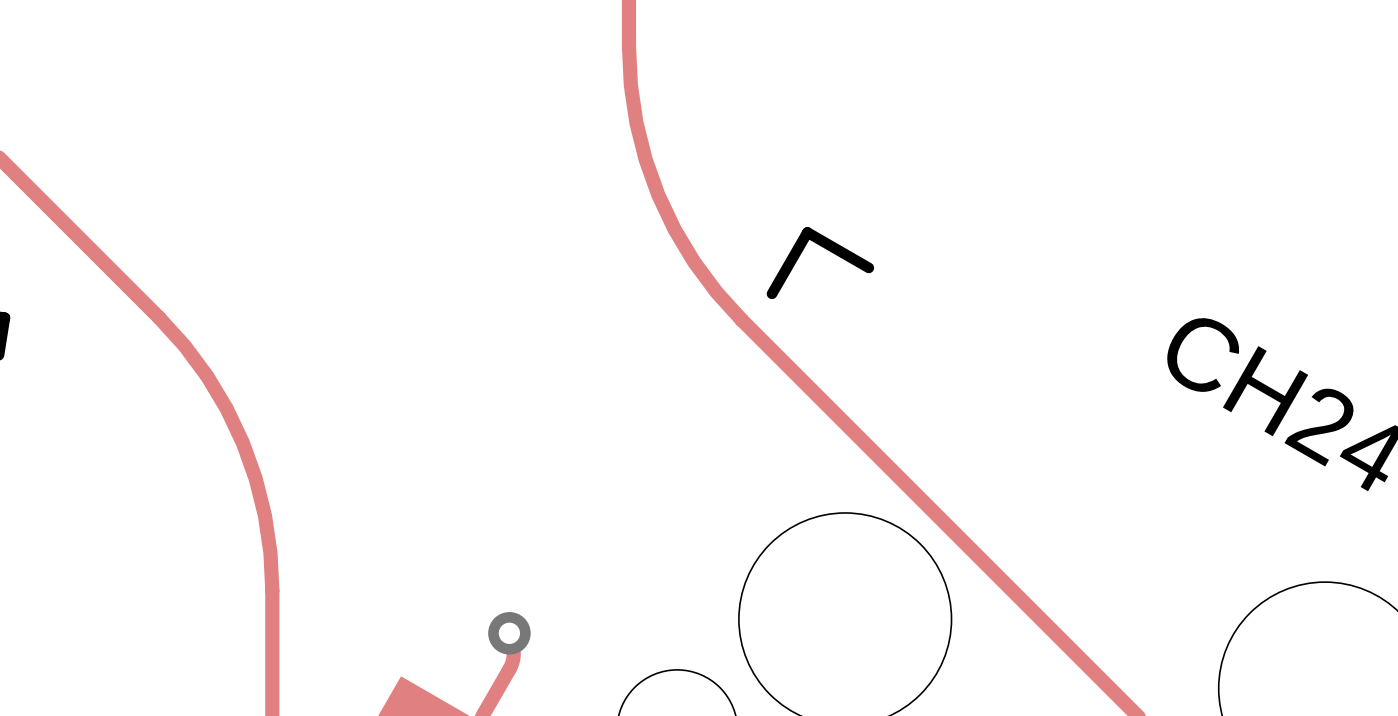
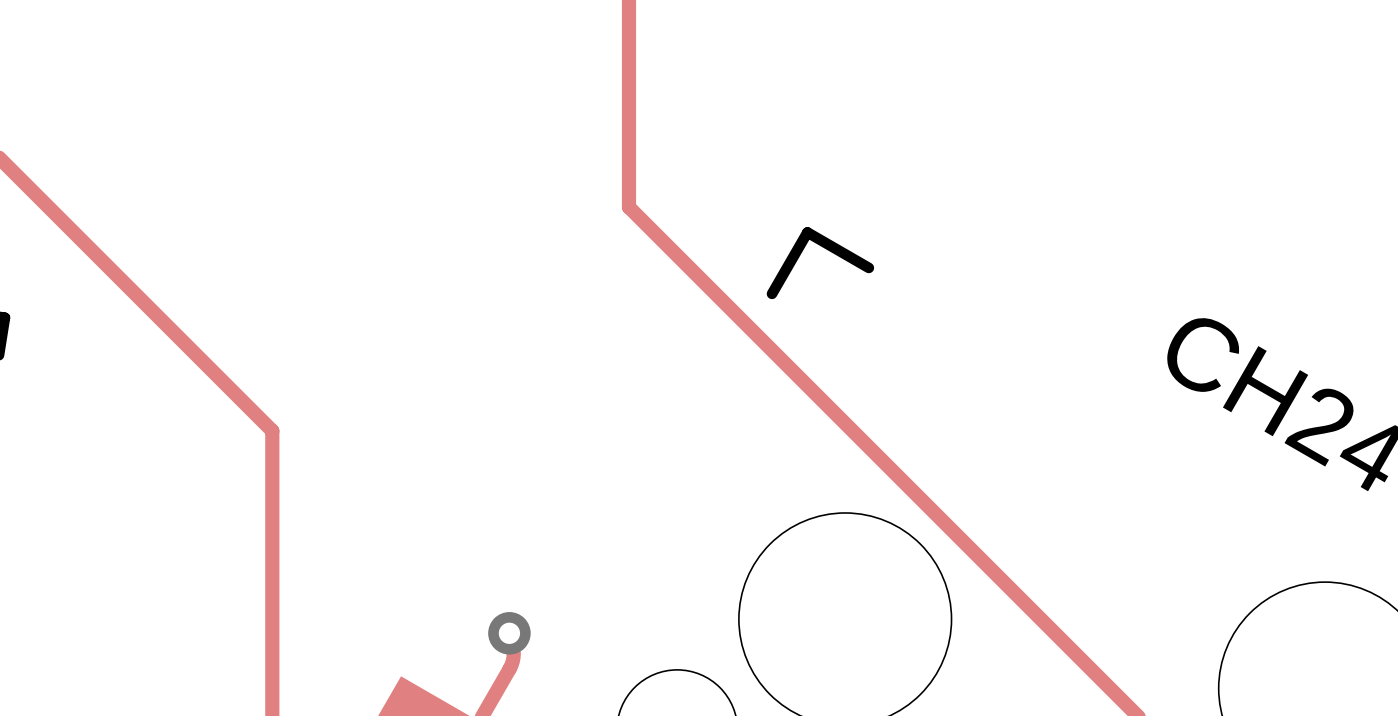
track: (629, 47) (630, 85) (636, 122) (645, 159) (658, 195) (674, 229) (694, 261) (716, 292) (741, 320) -> (629, 47) (629, 207) (741, 320)
track: (159, 317) (184, 346) (207, 376) (226, 408) (242, 443) (255, 478) (264, 515) (270, 552) (272, 590) -> (159, 317) (272, 430) (272, 590)

